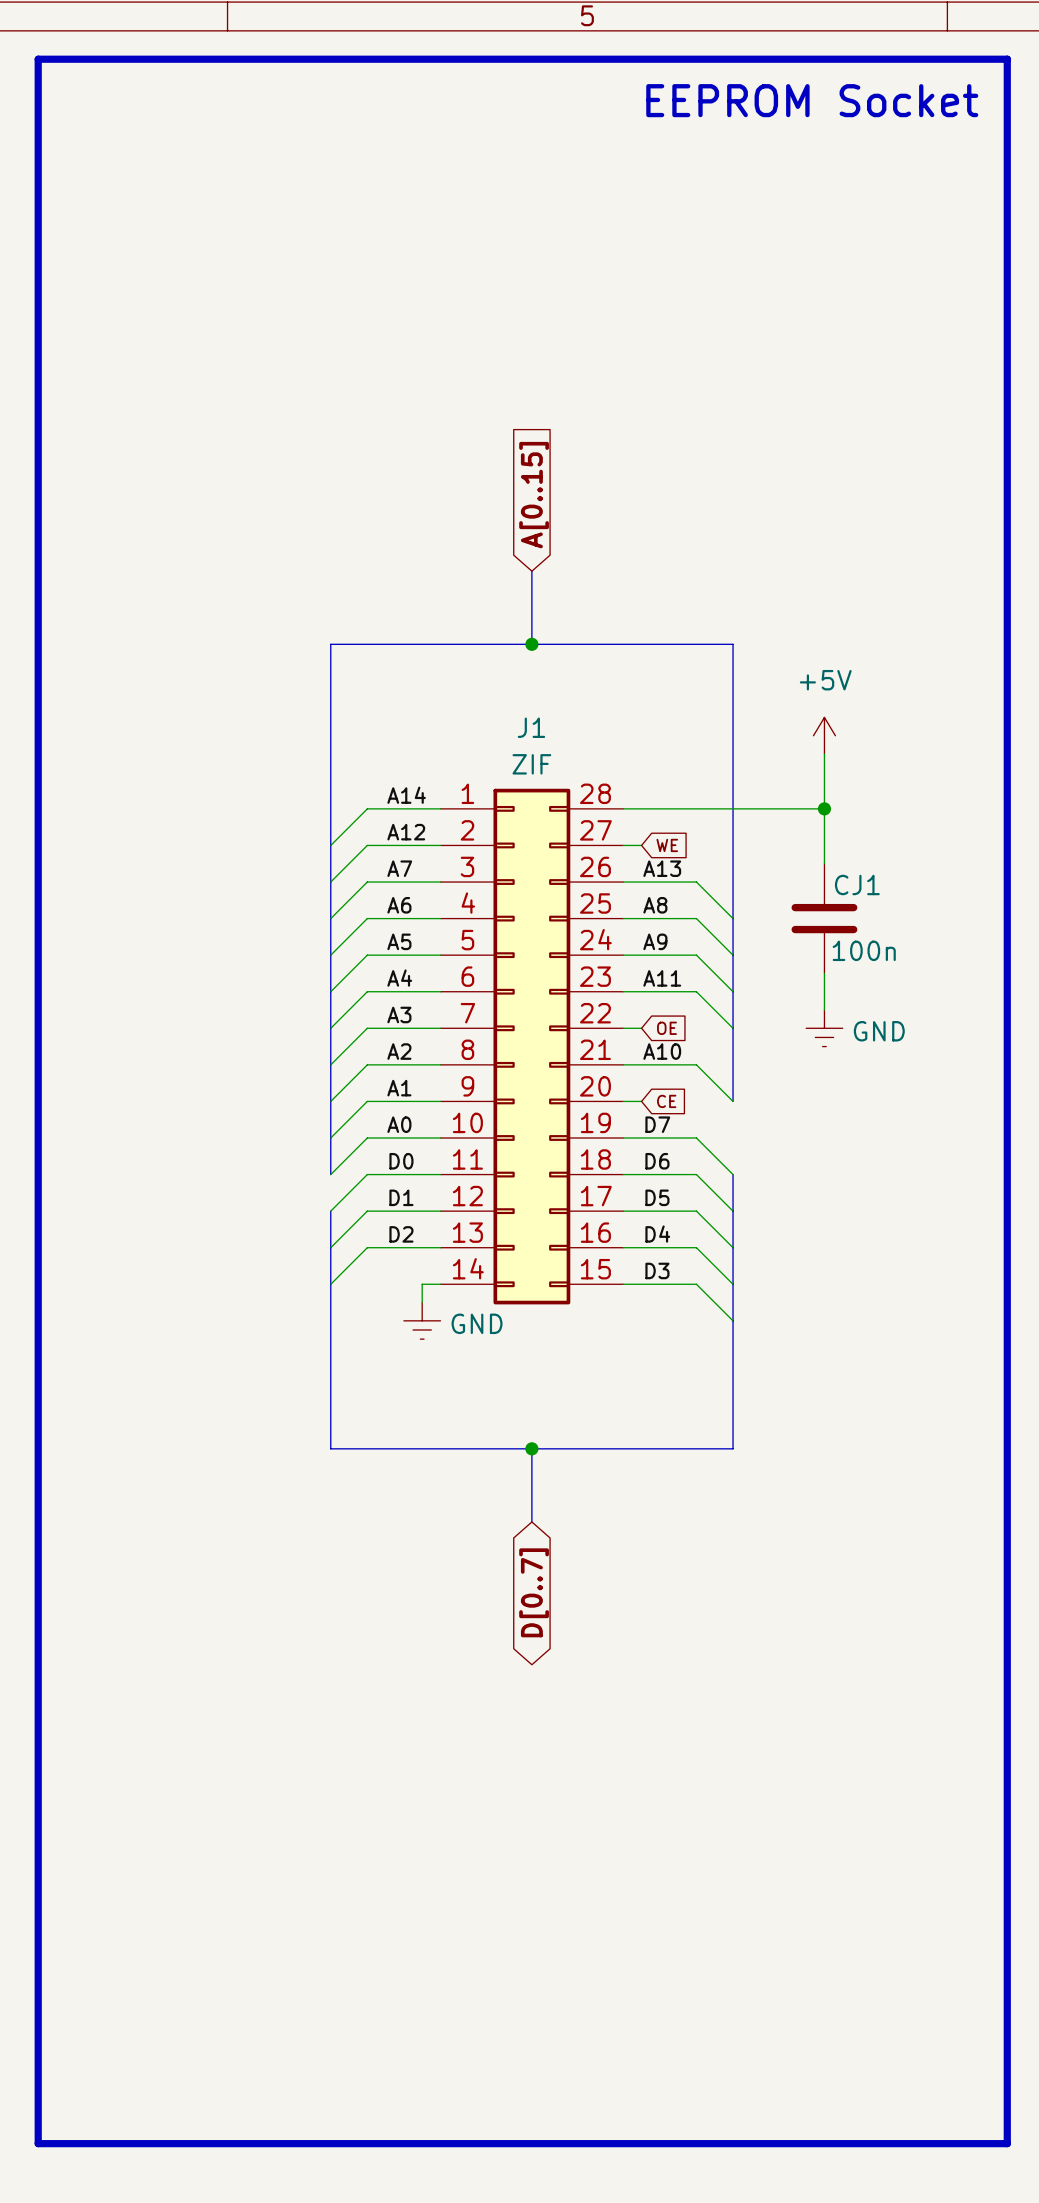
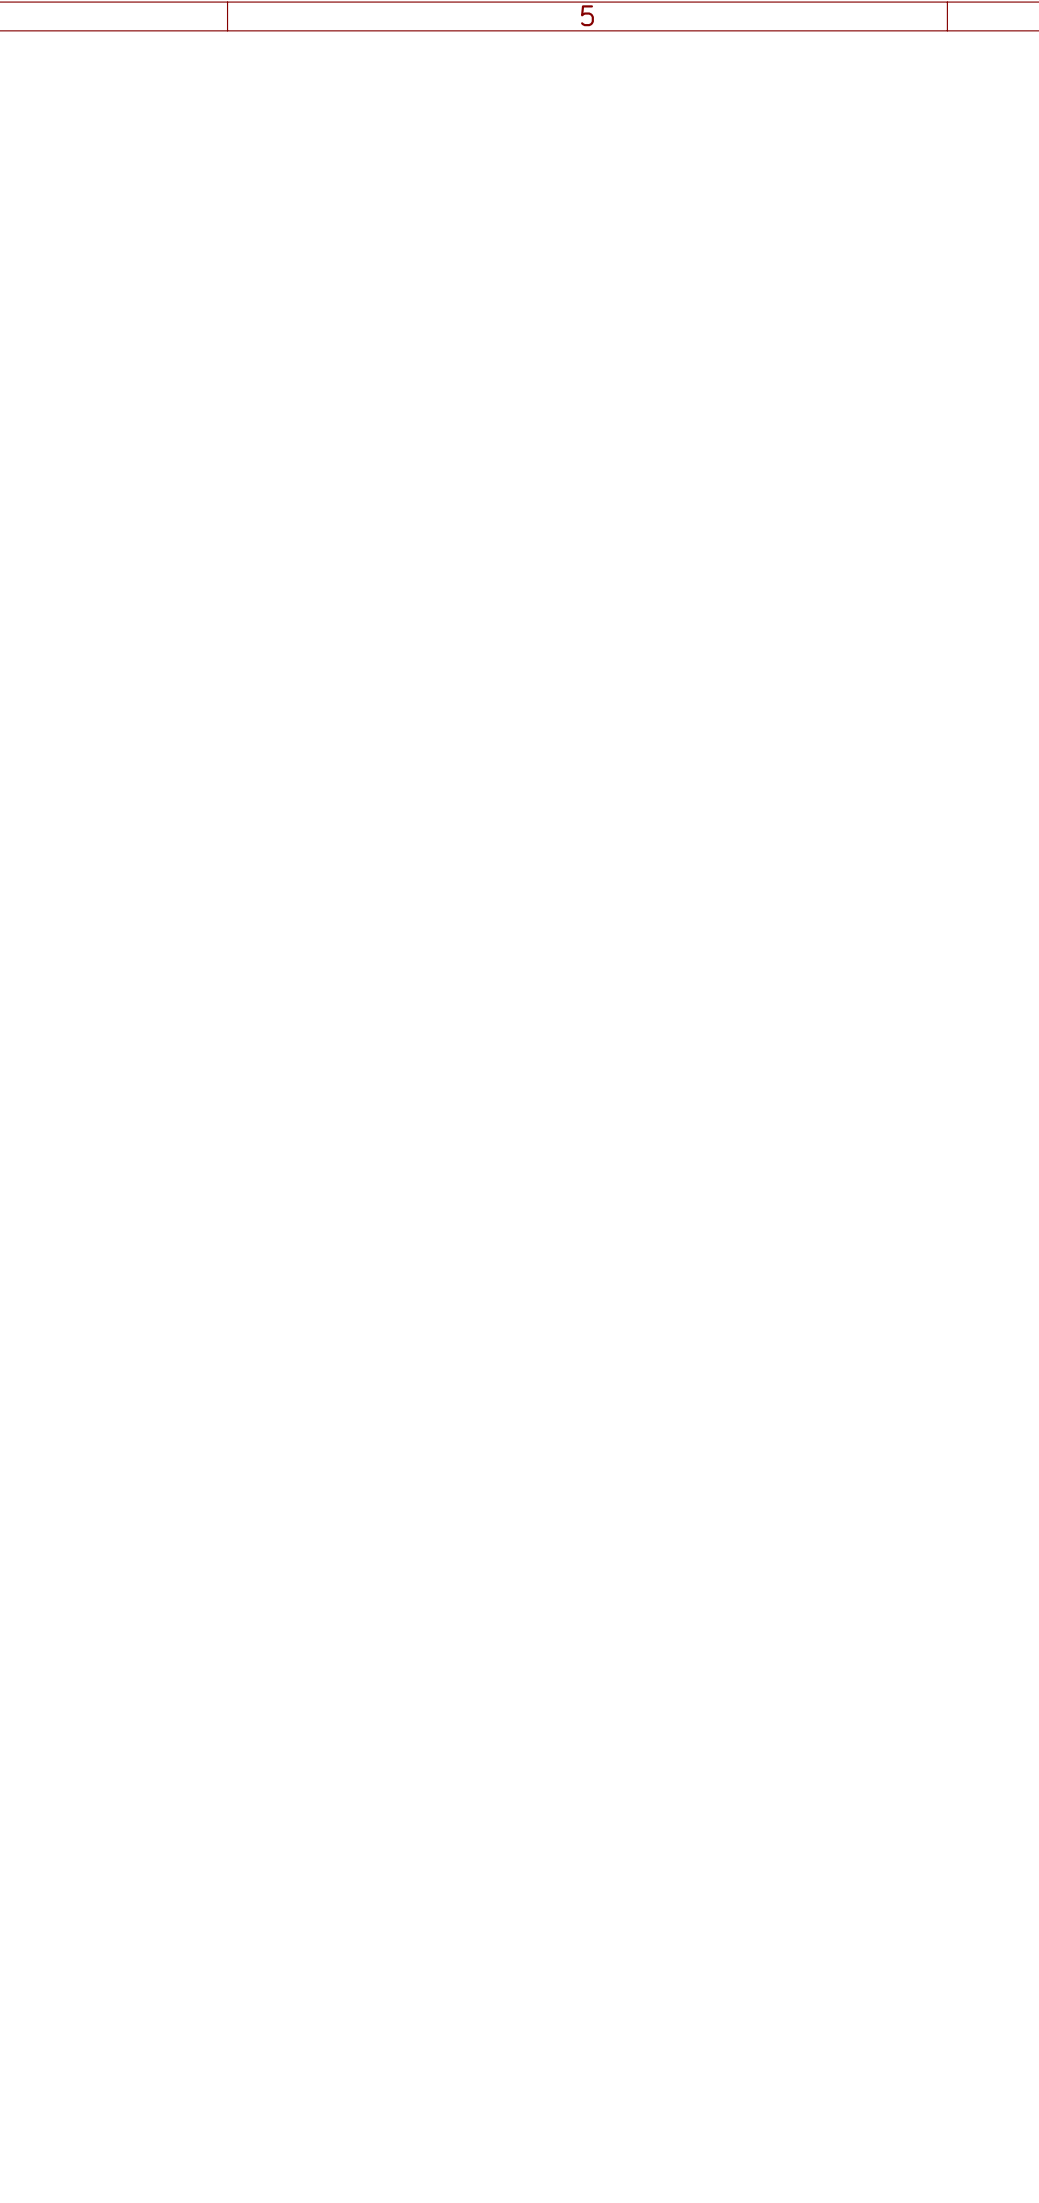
line: (38, 59) (1007, 59) (1007, 2143) (38, 2143) (38, 59) -> none
text: EEPROM Socket (812, 100) -> none
global label: A[0..15] (534, 495) -> none
bus: (531, 571) (531, 644) -> none
junction: (531, 644) -> none
power symbol: +5V (824, 735) -> none
wire: (824, 754) (824, 863) -> none
label: A14 (406, 795) -> none
wire: (440, 808) (367, 808) (330, 845) -> none
wire: (623, 808) (824, 808) -> none
junction: (824, 808) -> none
label: A12 (406, 832) -> none
wire: (440, 845) (367, 845) (330, 882) -> none
wire: (623, 845) (641, 845) -> none
global label: WE (667, 845) -> none
label: A7 (399, 868) -> none
label: A13 (662, 868) -> none
wire: (440, 882) (367, 882) (330, 918) -> none
wire: (623, 882) (696, 882) (733, 918) -> none
label: A6 (399, 905) -> none
label: A8 (655, 905) -> none
wire: (440, 918) (367, 918) (330, 955) -> none
wire: (623, 918) (696, 918) (733, 955) -> none
CJ1: 100n (824, 918) -> none
label: A5 (399, 941) -> none
label: A9 (655, 941) -> none
wire: (440, 955) (367, 955) (330, 991) -> none
wire: (623, 955) (696, 955) (733, 991) -> none
wire: (824, 973) (824, 1010) -> none
label: A4 (399, 978) -> none
label: A11 (662, 978) -> none
wire: (440, 991) (367, 991) (330, 1028) -> none
wire: (623, 991) (696, 991) (733, 1028) -> none
label: A3 (399, 1014) -> none
wire: (440, 1028) (367, 1028) (330, 1064) -> none
wire: (623, 1028) (641, 1028) -> none
global label: OE (666, 1028) -> none
power symbol: GND (824, 1028) -> none
J1: ZIF (531, 1046) -> none
label: A2 (399, 1051) -> none
label: A10 (662, 1051) -> none
wire: (440, 1064) (367, 1064) (330, 1101) -> none
wire: (623, 1064) (696, 1064) (733, 1101) -> none
label: A1 (399, 1088) -> none
wire: (440, 1101) (367, 1101) (330, 1138) -> none
wire: (623, 1101) (641, 1101) -> none
global label: CE (666, 1101) -> none
bus: (733, 1101) (733, 644) (330, 644) (330, 1174) -> none
label: A0 (399, 1124) -> none
label: D7 (657, 1124) -> none
wire: (440, 1138) (367, 1138) (330, 1174) -> none
wire: (623, 1138) (696, 1138) (733, 1174) -> none
label: D0 (401, 1161) -> none
label: D6 (657, 1161) -> none
wire: (440, 1174) (367, 1174) (330, 1211) -> none
wire: (623, 1174) (696, 1174) (733, 1211) -> none
bus: (733, 1174) (733, 1448) (330, 1448) (330, 1211) -> none
label: D1 (401, 1197) -> none
label: D5 (657, 1197) -> none
wire: (440, 1211) (367, 1211) (330, 1247) -> none
wire: (623, 1211) (696, 1211) (733, 1247) -> none
label: D2 (401, 1234) -> none
label: D4 (657, 1234) -> none
wire: (440, 1247) (367, 1247) (330, 1284) -> none
wire: (623, 1247) (696, 1247) (733, 1284) -> none
label: D3 (657, 1270) -> none
wire: (440, 1284) (422, 1284) (422, 1302) -> none
wire: (623, 1284) (696, 1284) (733, 1320) -> none
power symbol: GND (422, 1320) -> none
bus: (531, 1448) (531, 1521) -> none
junction: (531, 1448) -> none
global label: D[0..7] (534, 1592) -> none

